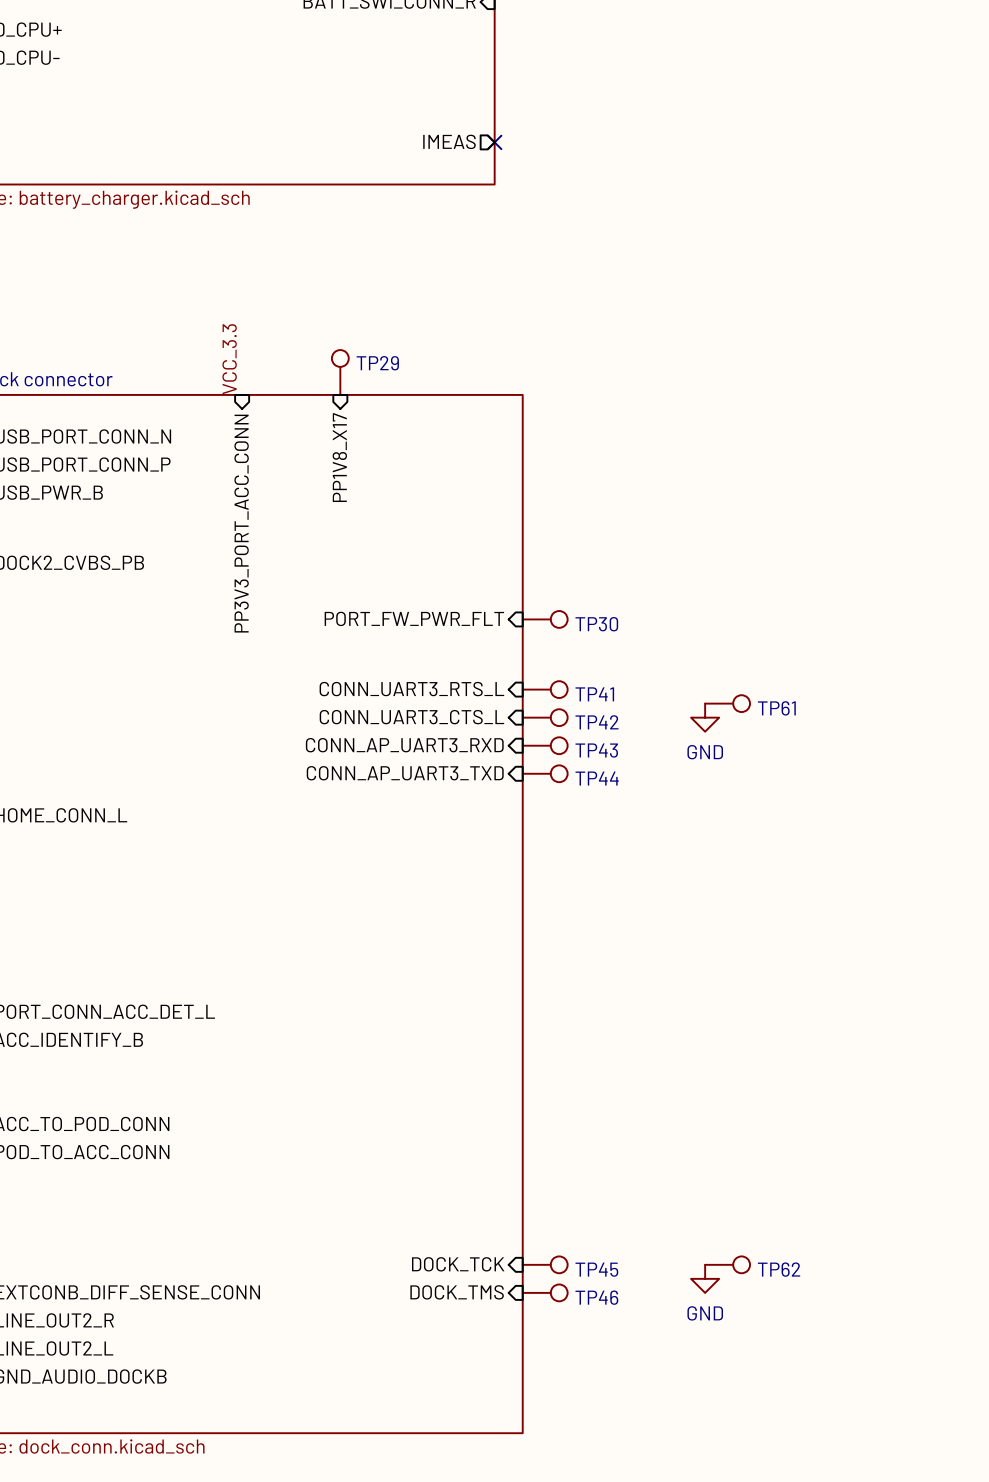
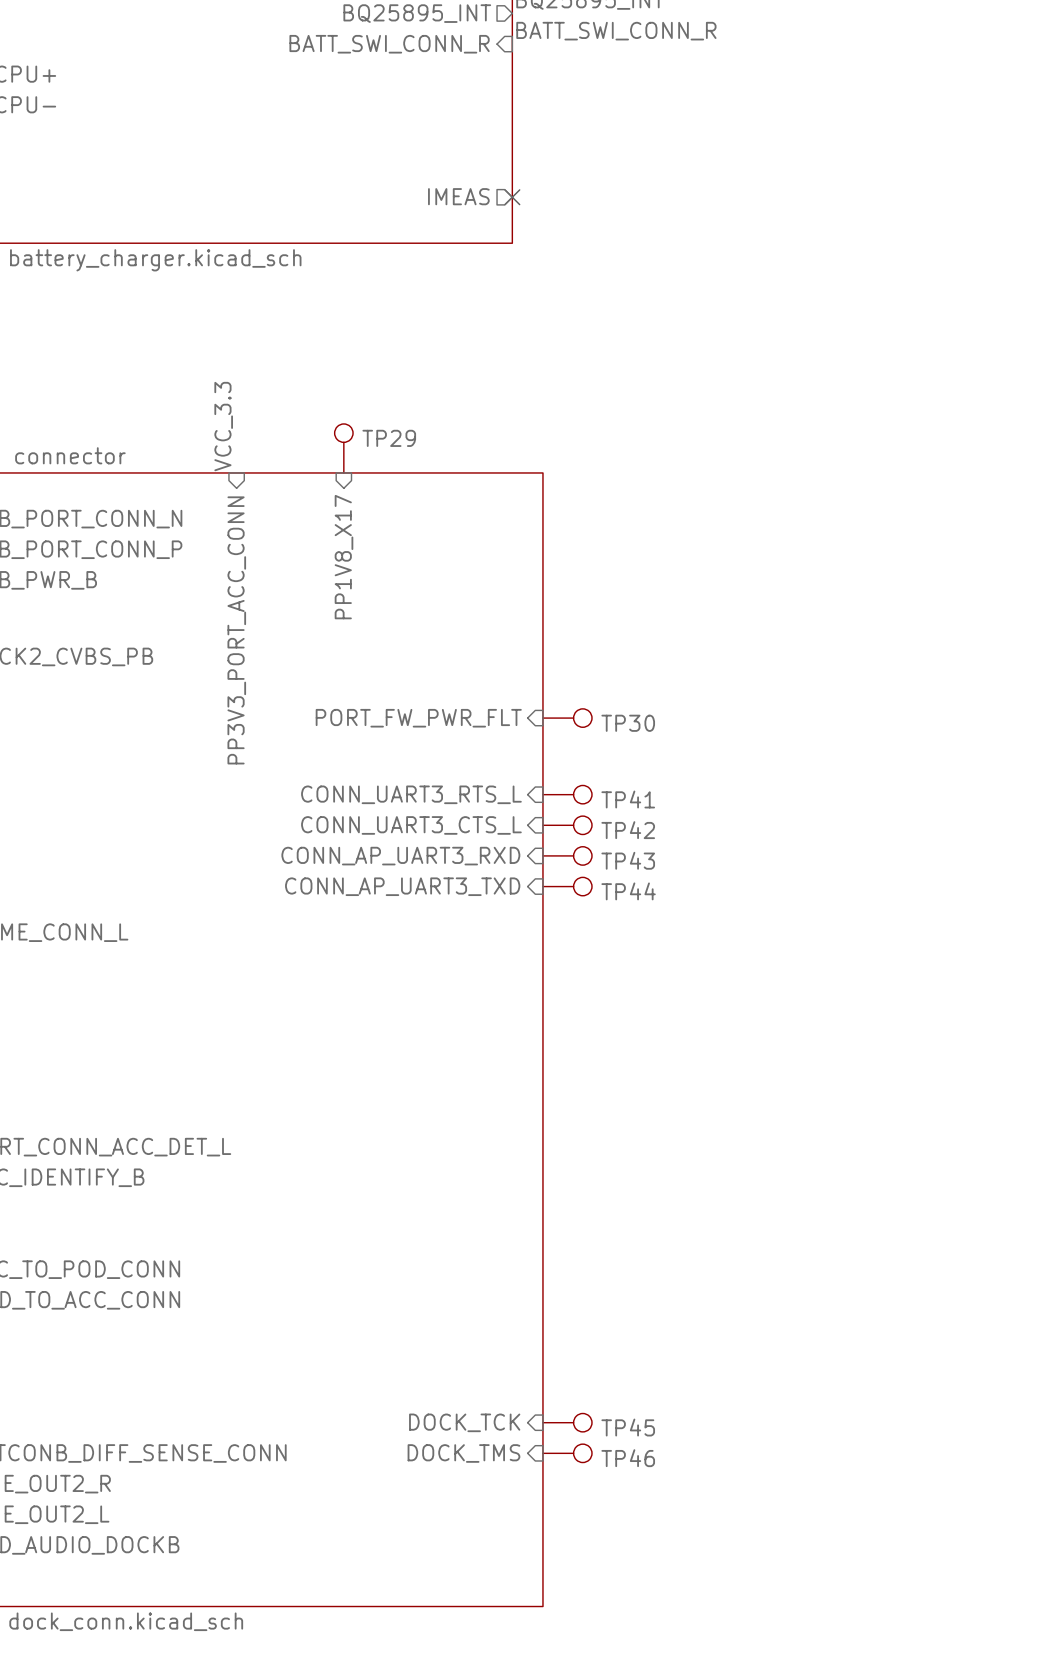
TP61: (727, 703) -> none
power symbol: GND (705, 717) -> none
TP62: (727, 1264) -> none
power symbol: GND (705, 1278) -> none

